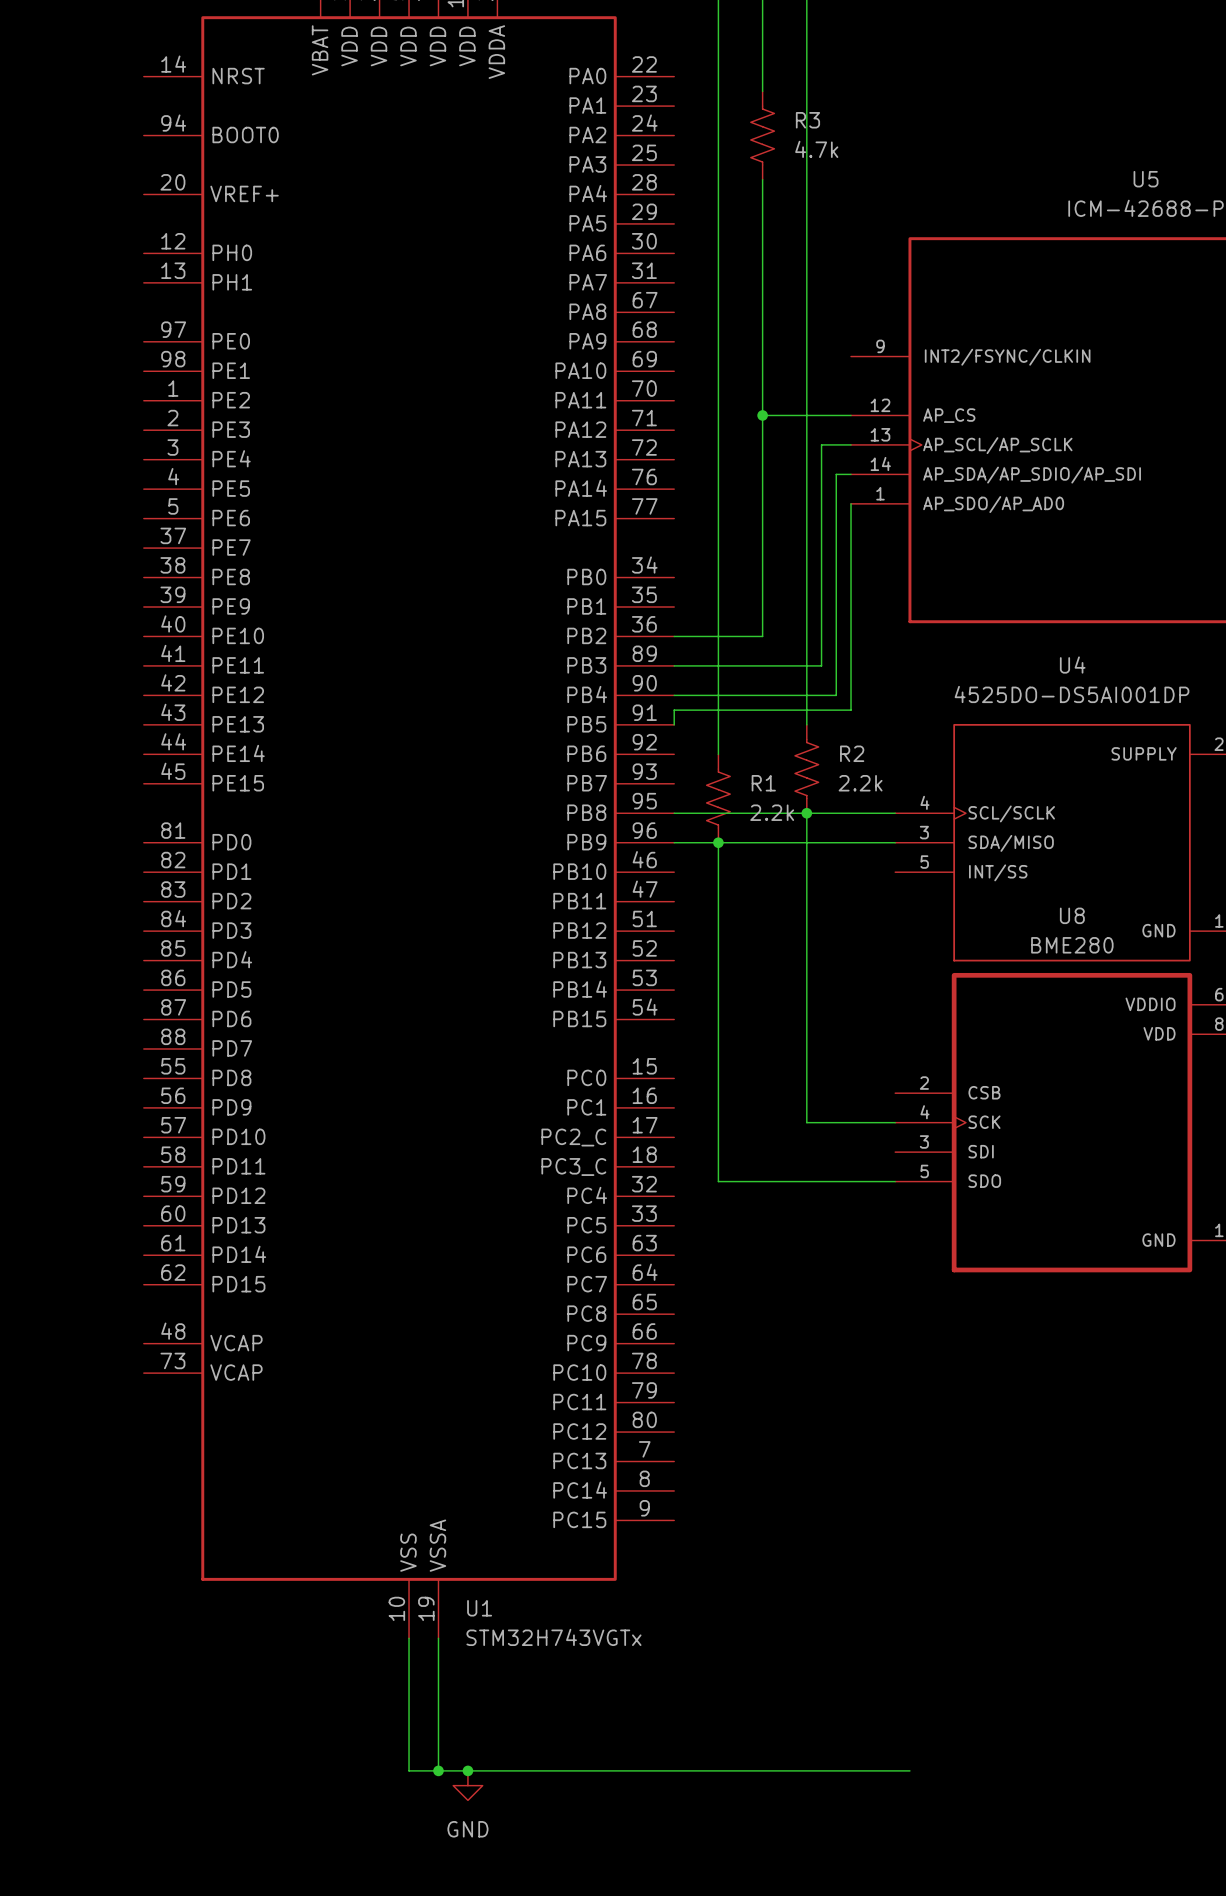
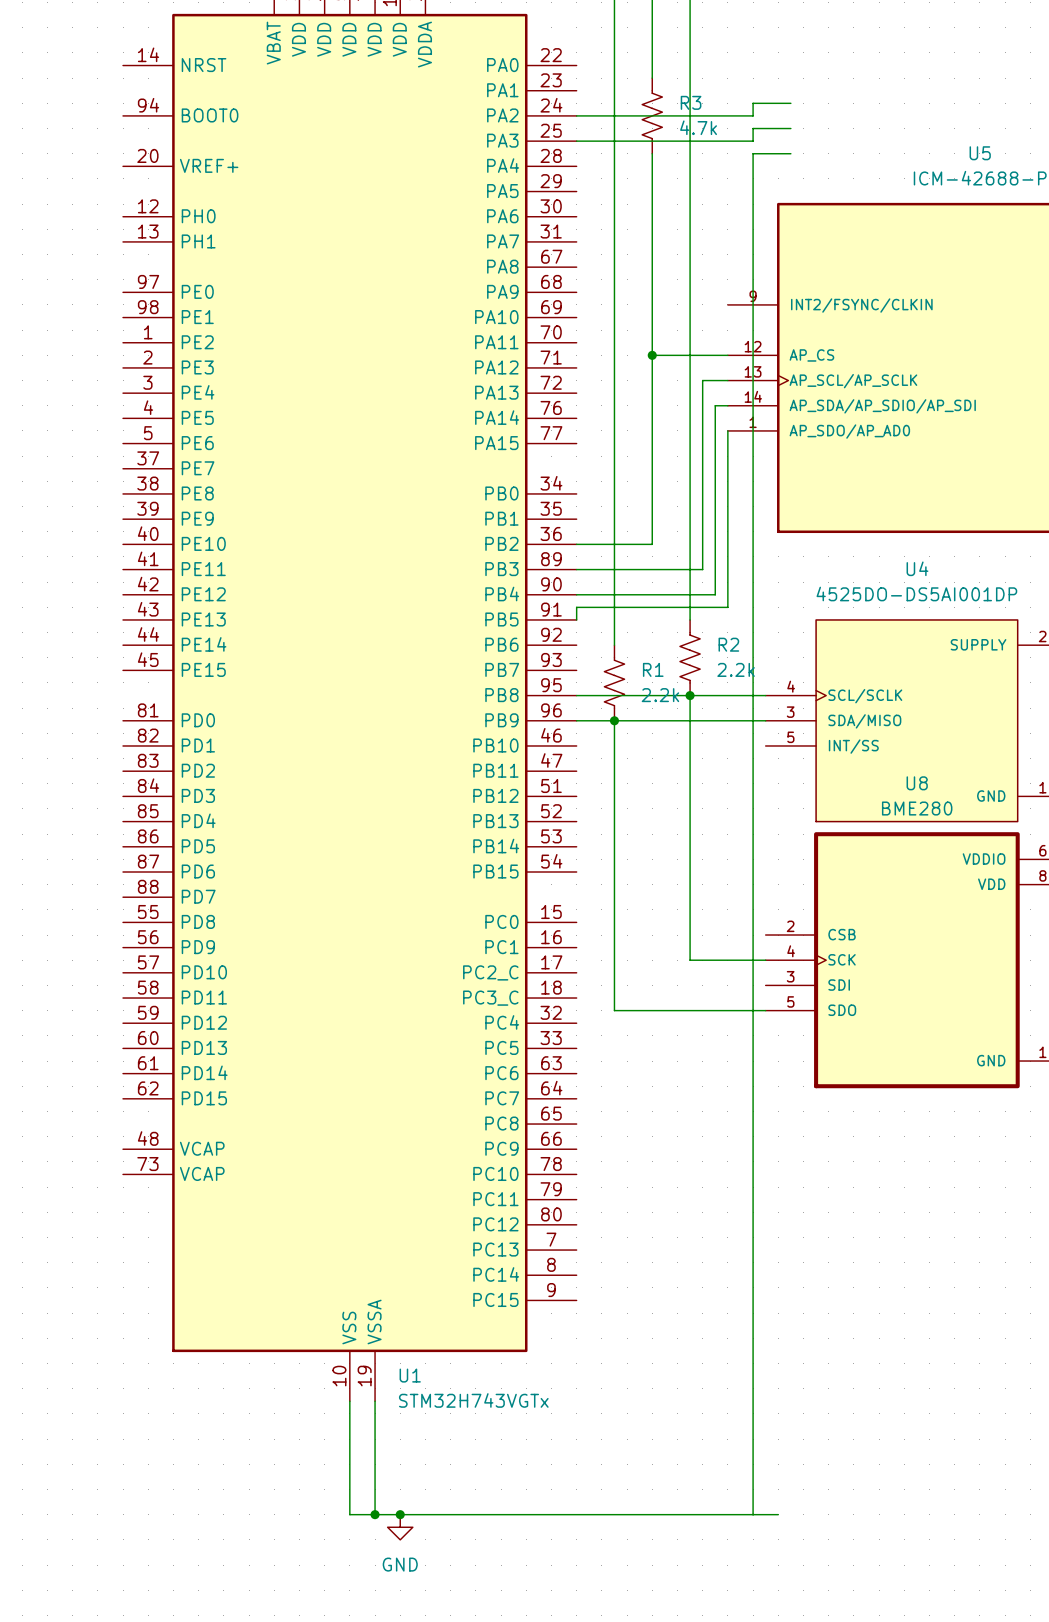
wire: none -> (790, 103) (753, 103) (753, 115) (576, 115)
wire: none -> (790, 128) (753, 128) (753, 141) (576, 141)
wire: none -> (790, 153) (753, 153) (753, 1514)

